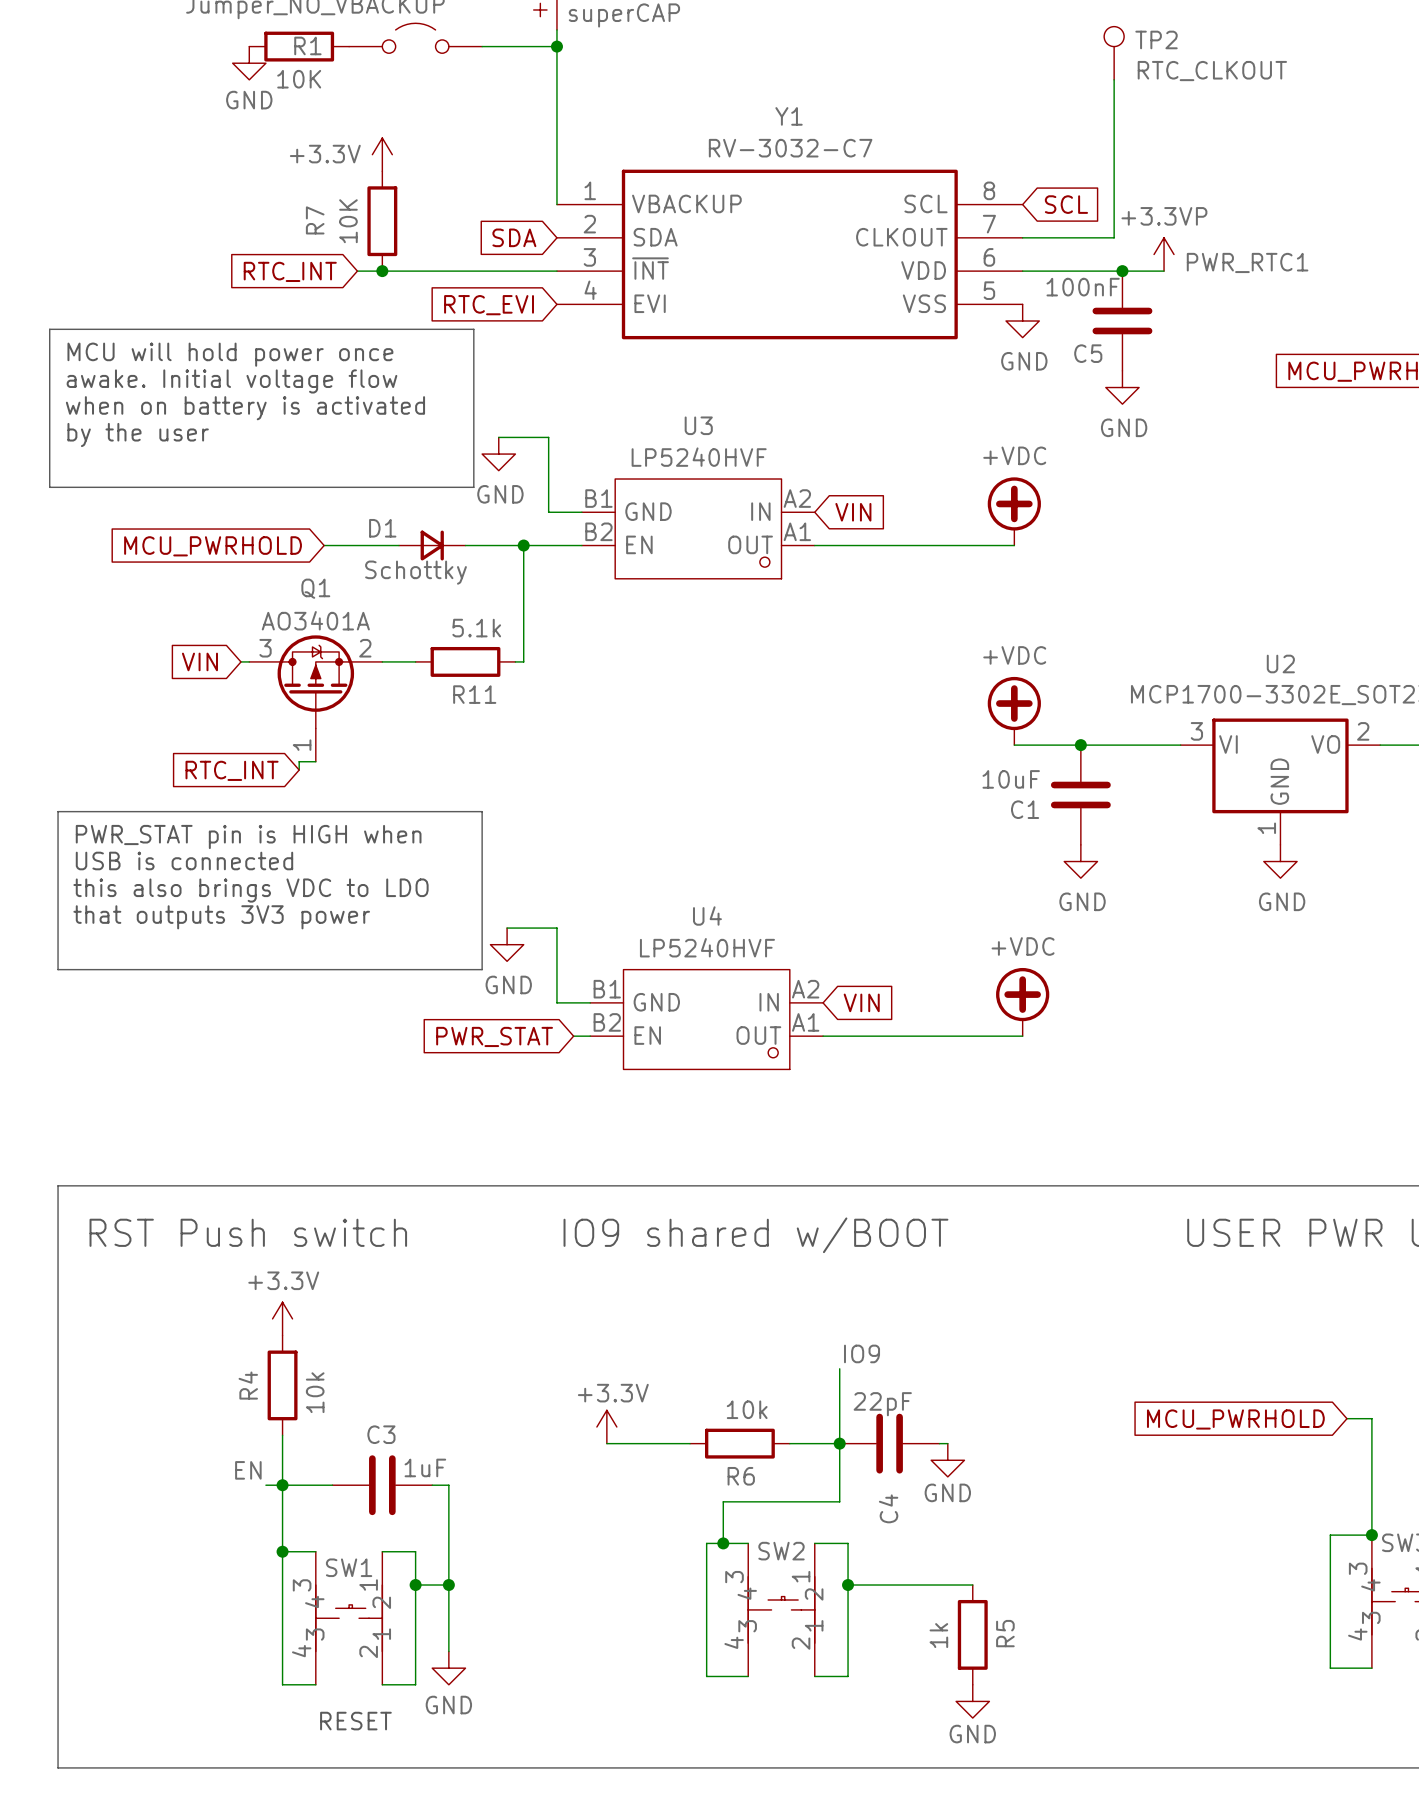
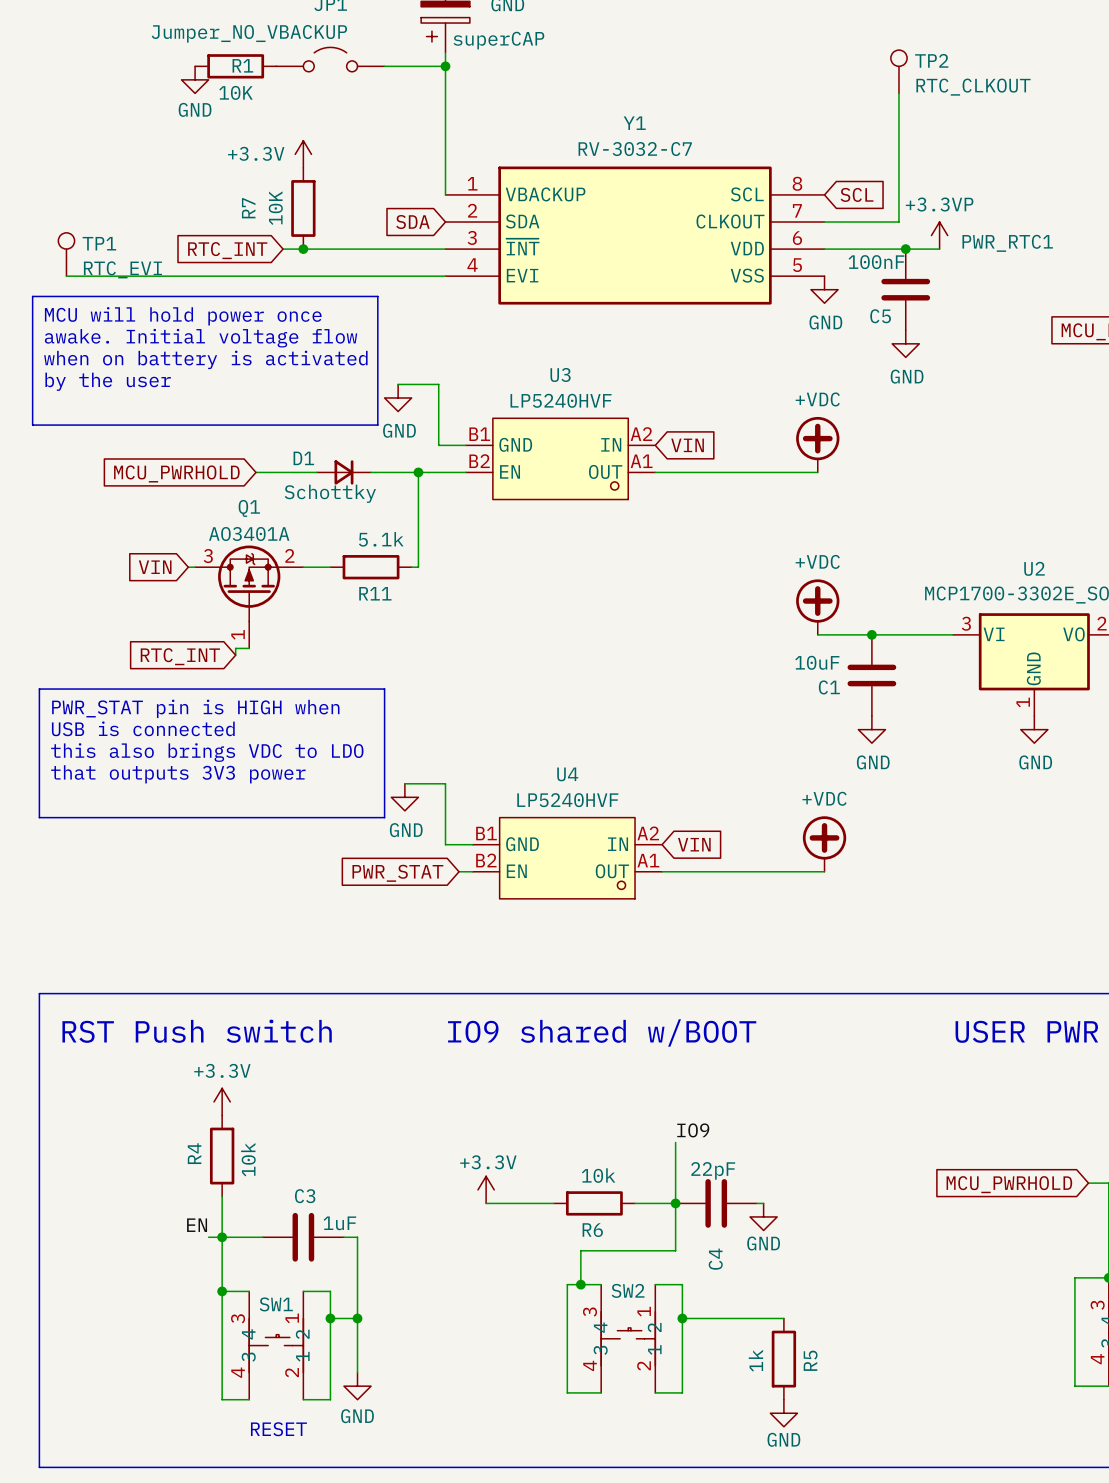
TP1: none -> RTC_EVI (66, 254)
wire: none -> (66, 276) (445, 276)
global label: RTC_EVI (489, 305) -> none

